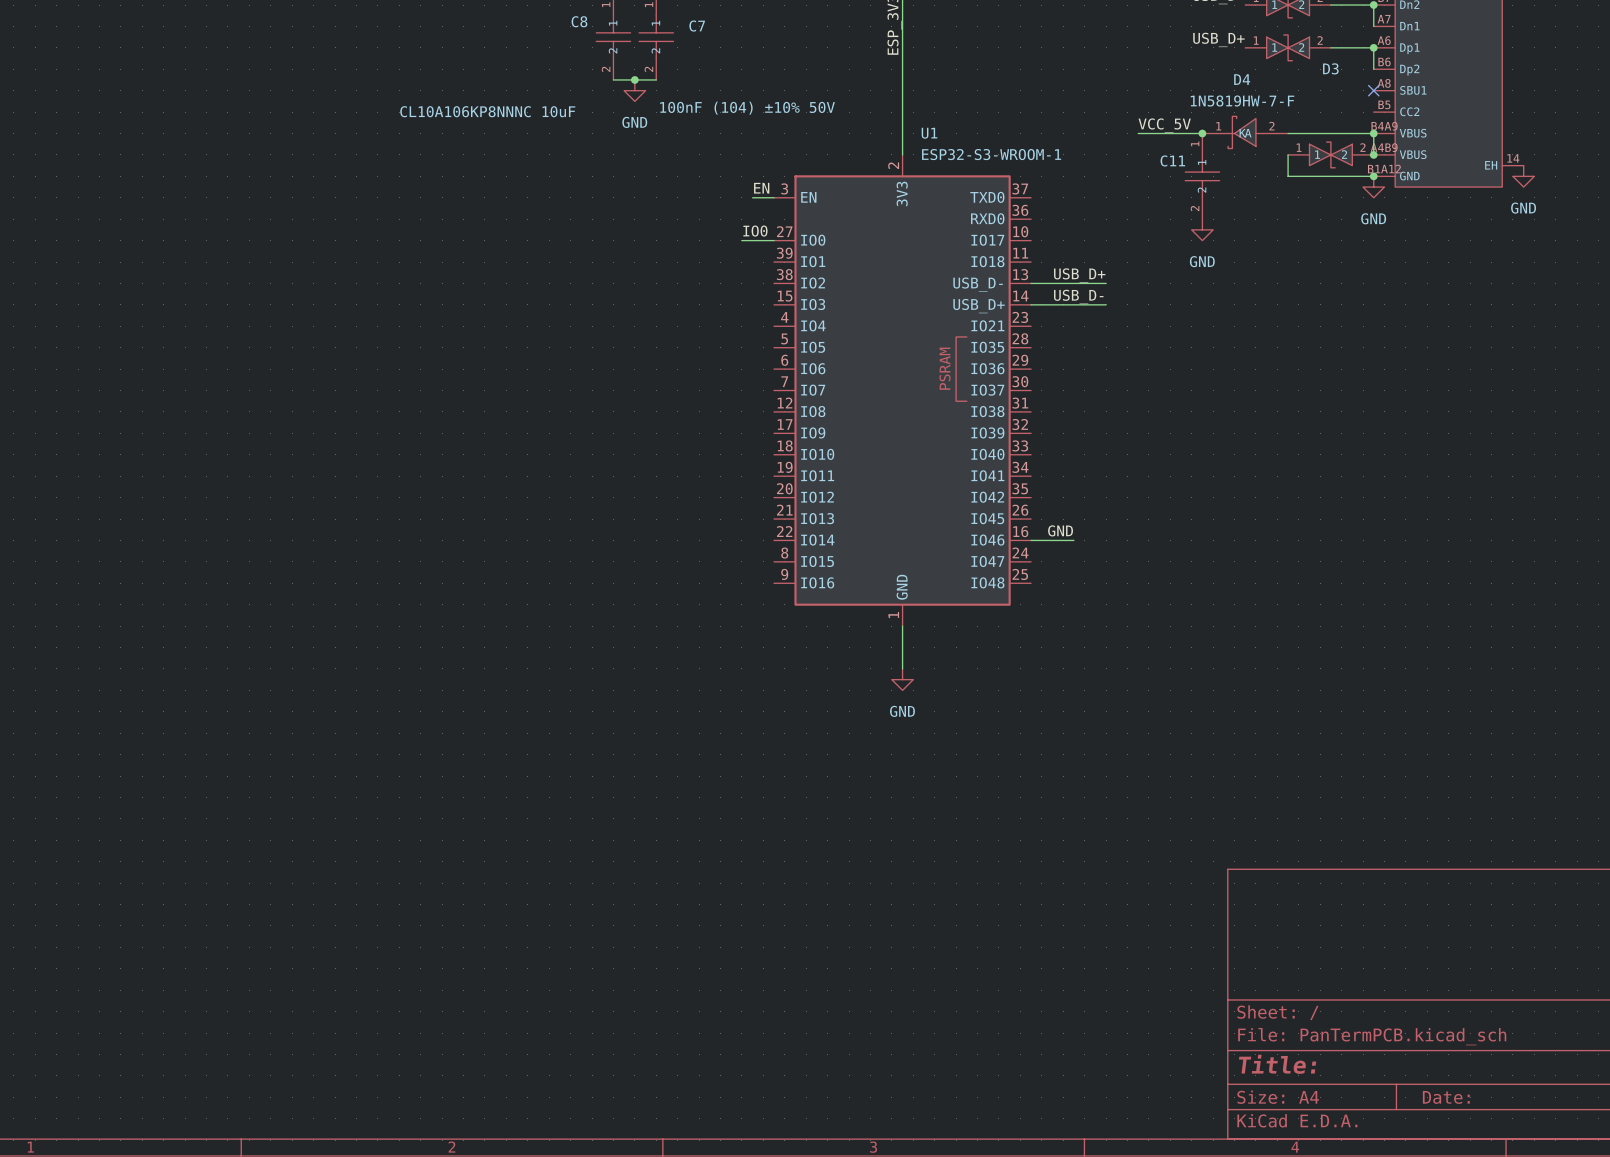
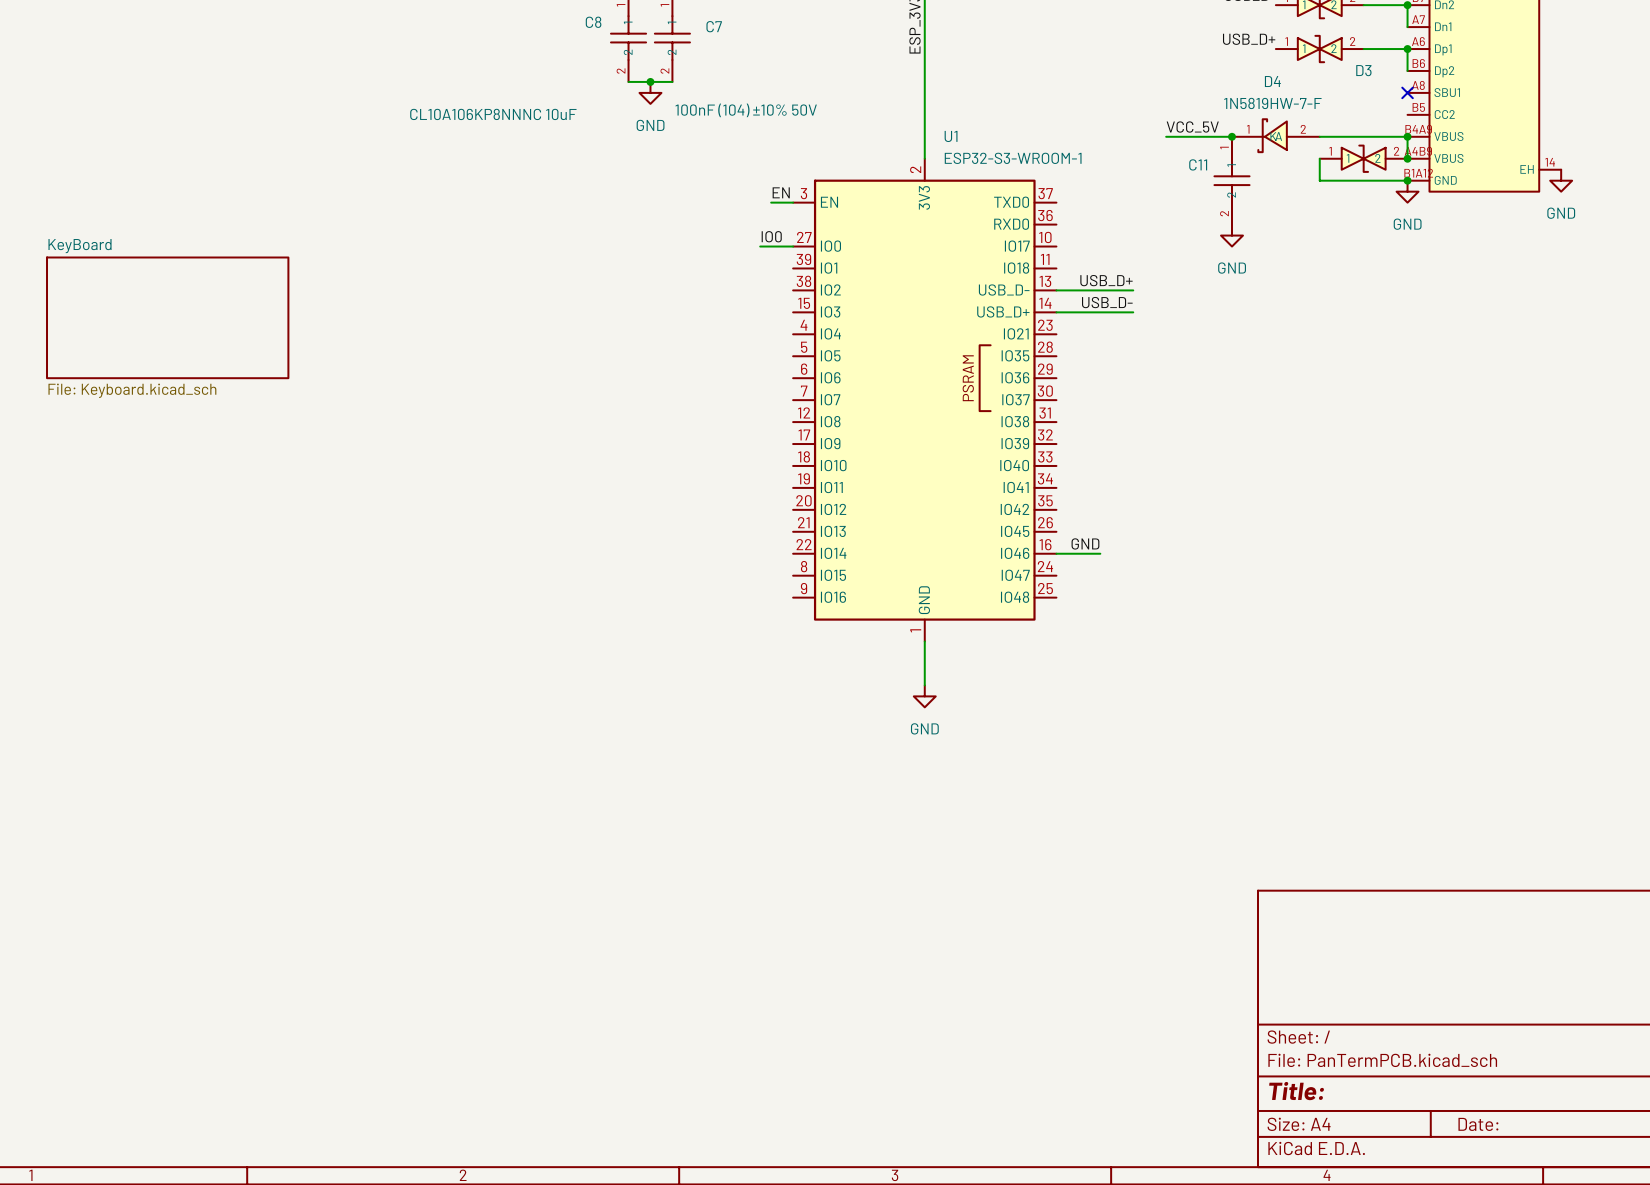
sheet KeyBoard: none -> File: Keyboard.kicad_sch (167, 317)

